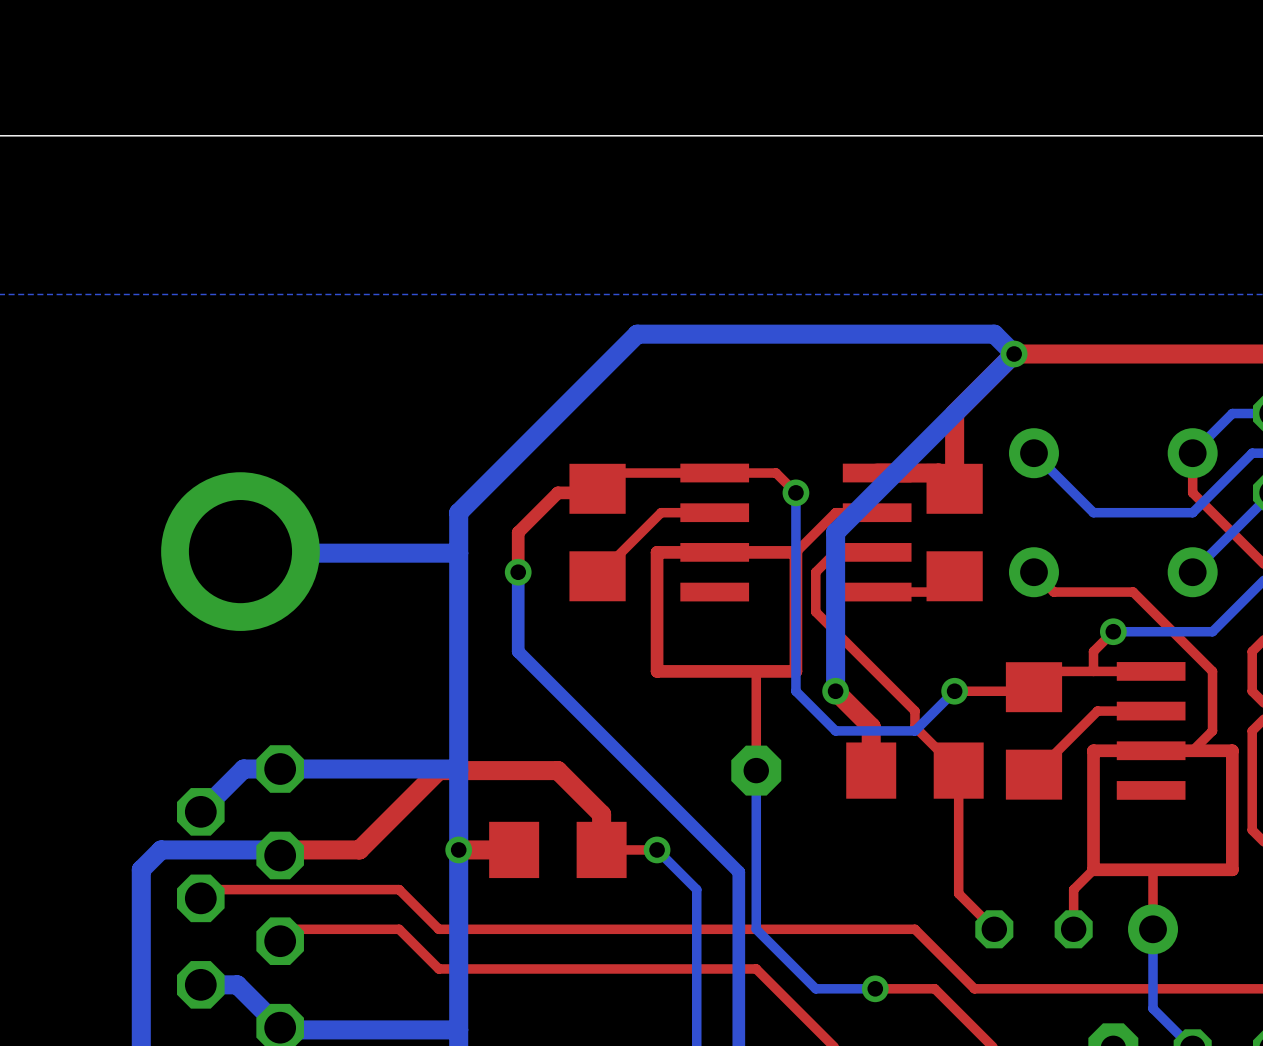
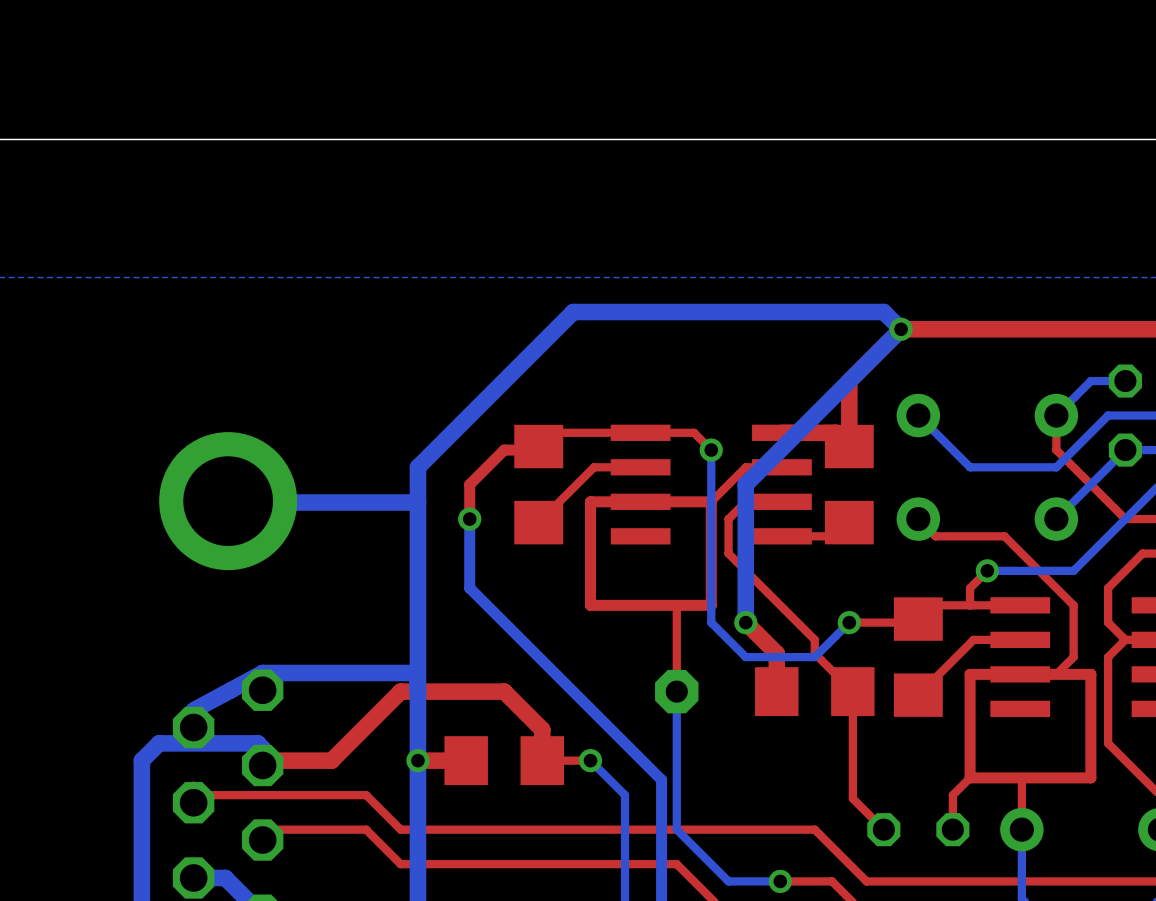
bottom track: (458, 770) (457, 769) (243, 769) (200, 811) -> (417, 691) (416, 672) (262, 672) (193, 710)
bottom track: (280, 855) (274, 849) (161, 849) (141, 869) -> (262, 748) (257, 743) (159, 743) (141, 760) (141, 777)

